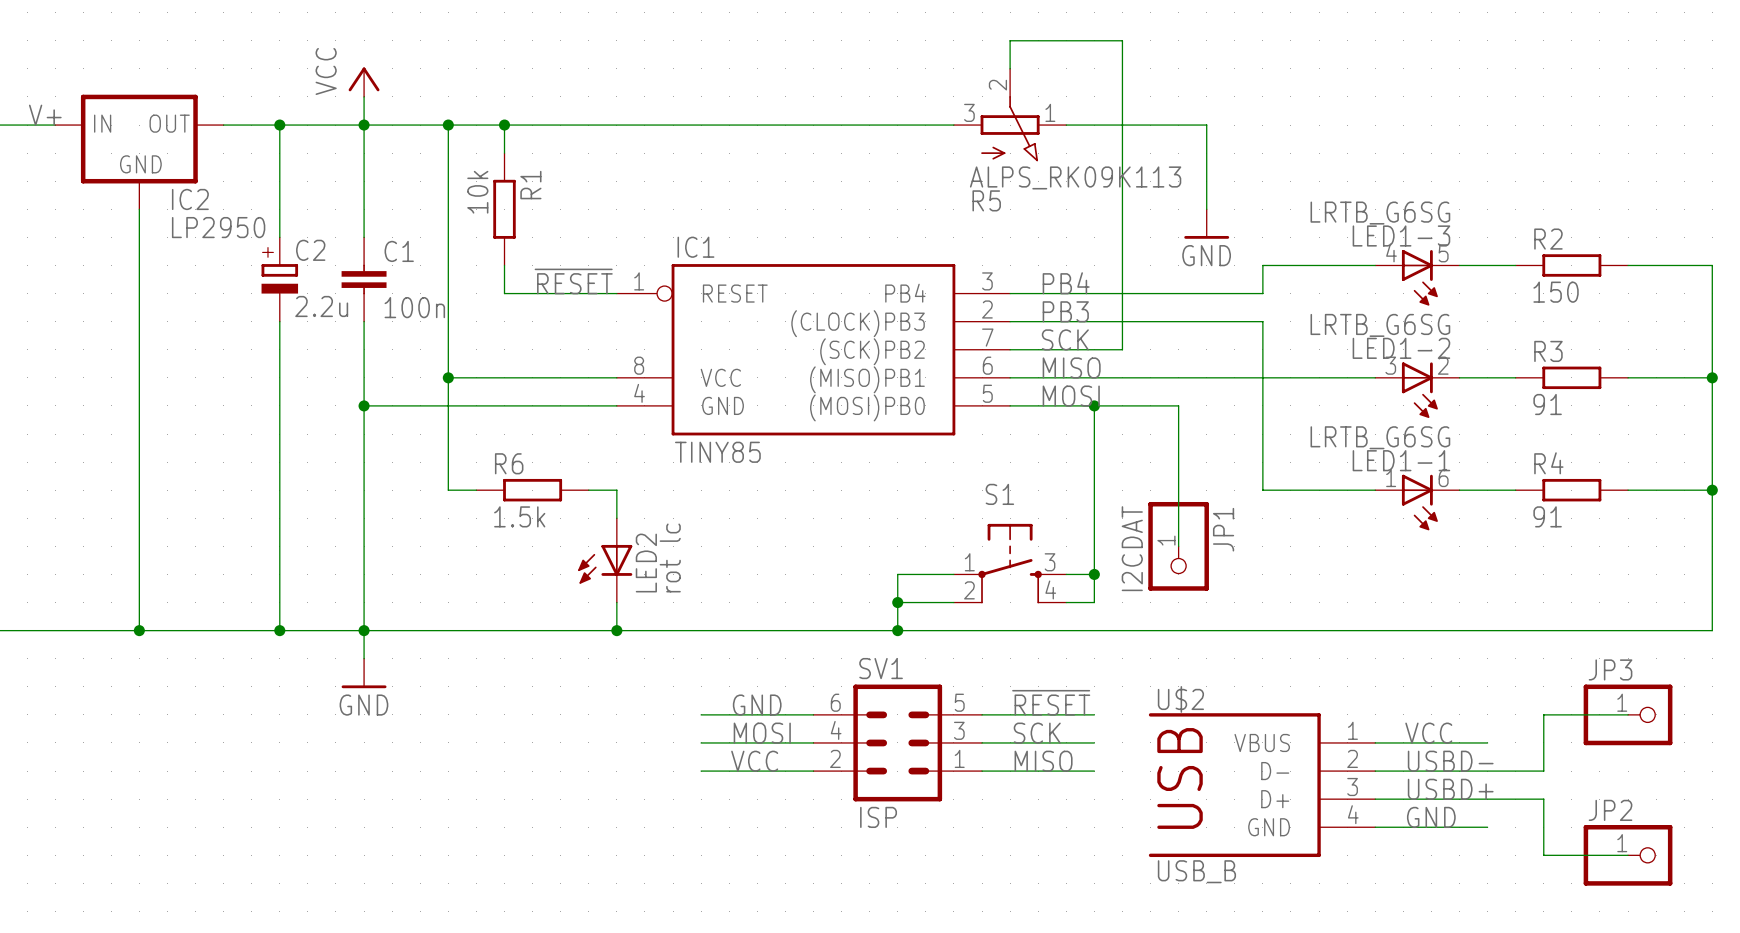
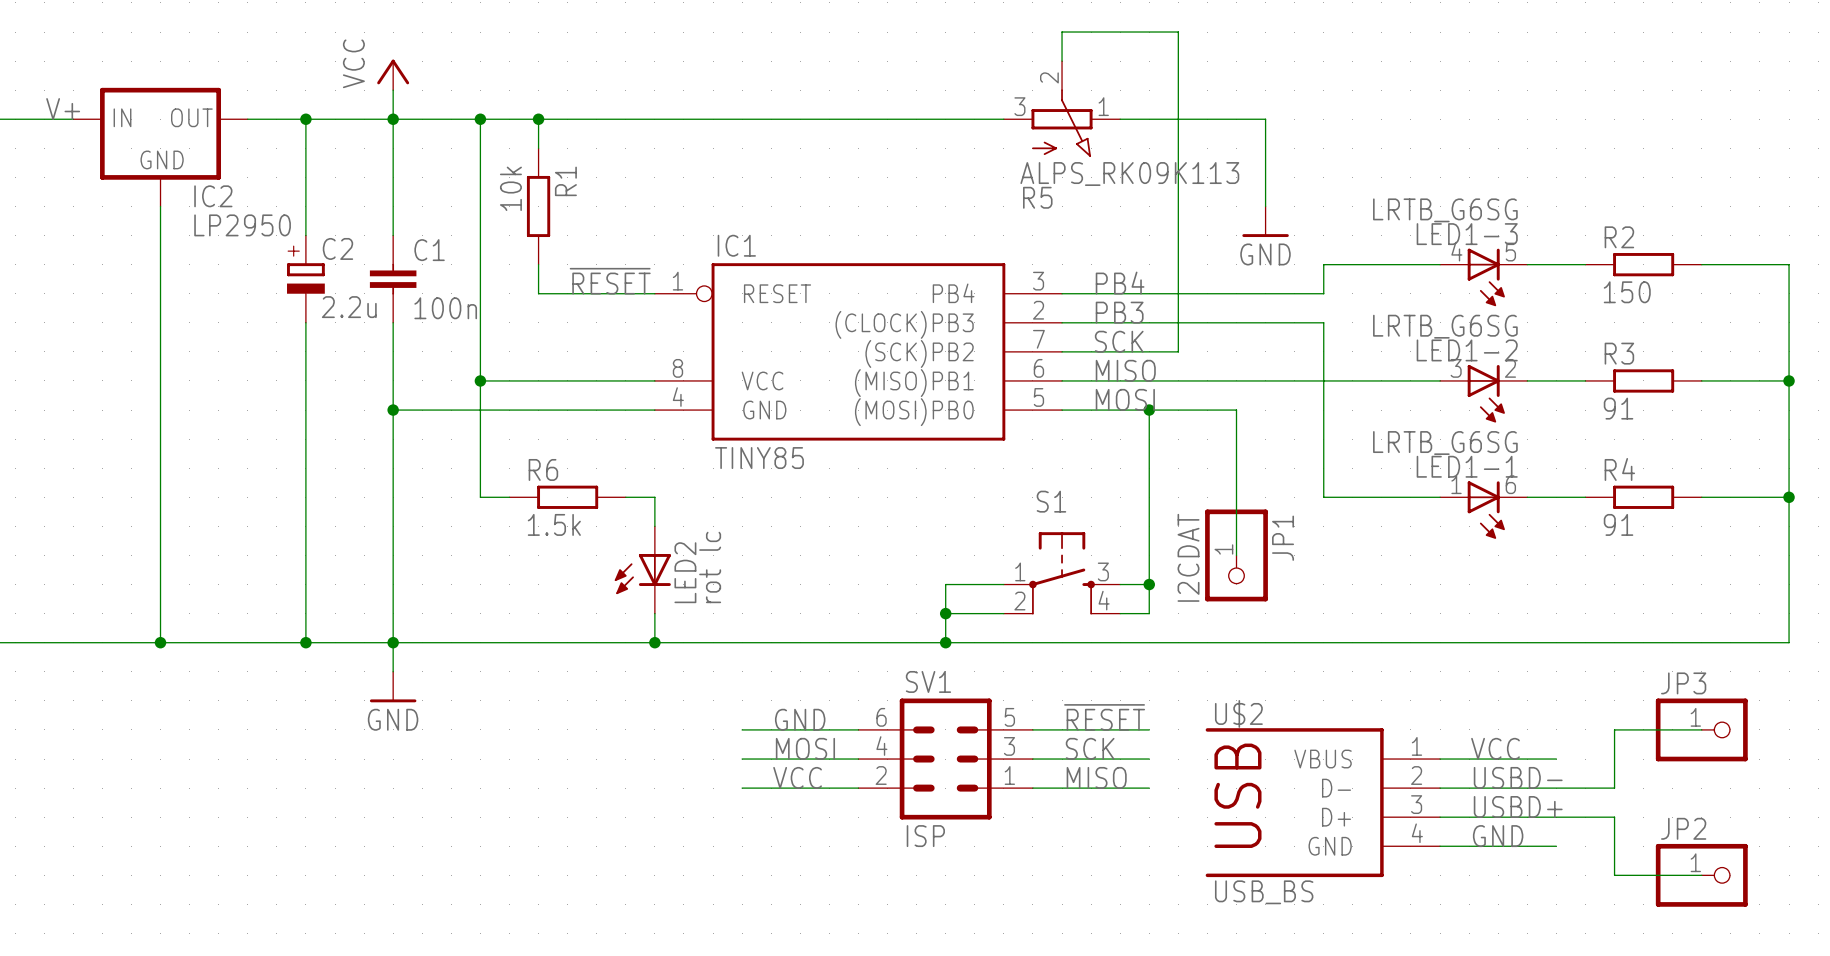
U$2 value: USB_B (1196, 871) -> USB_BS (1264, 892)

